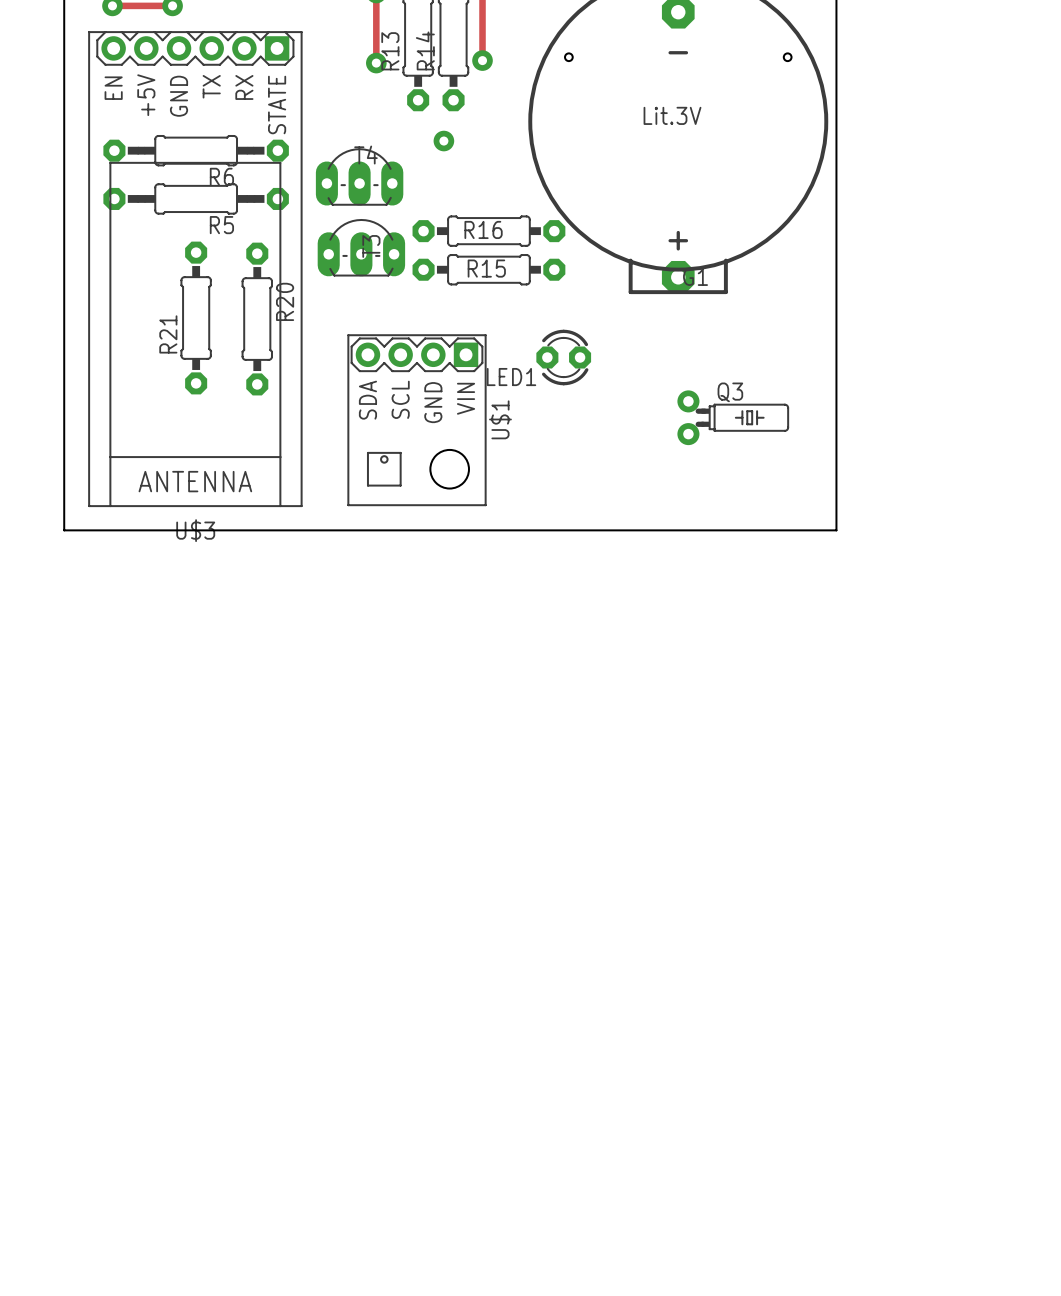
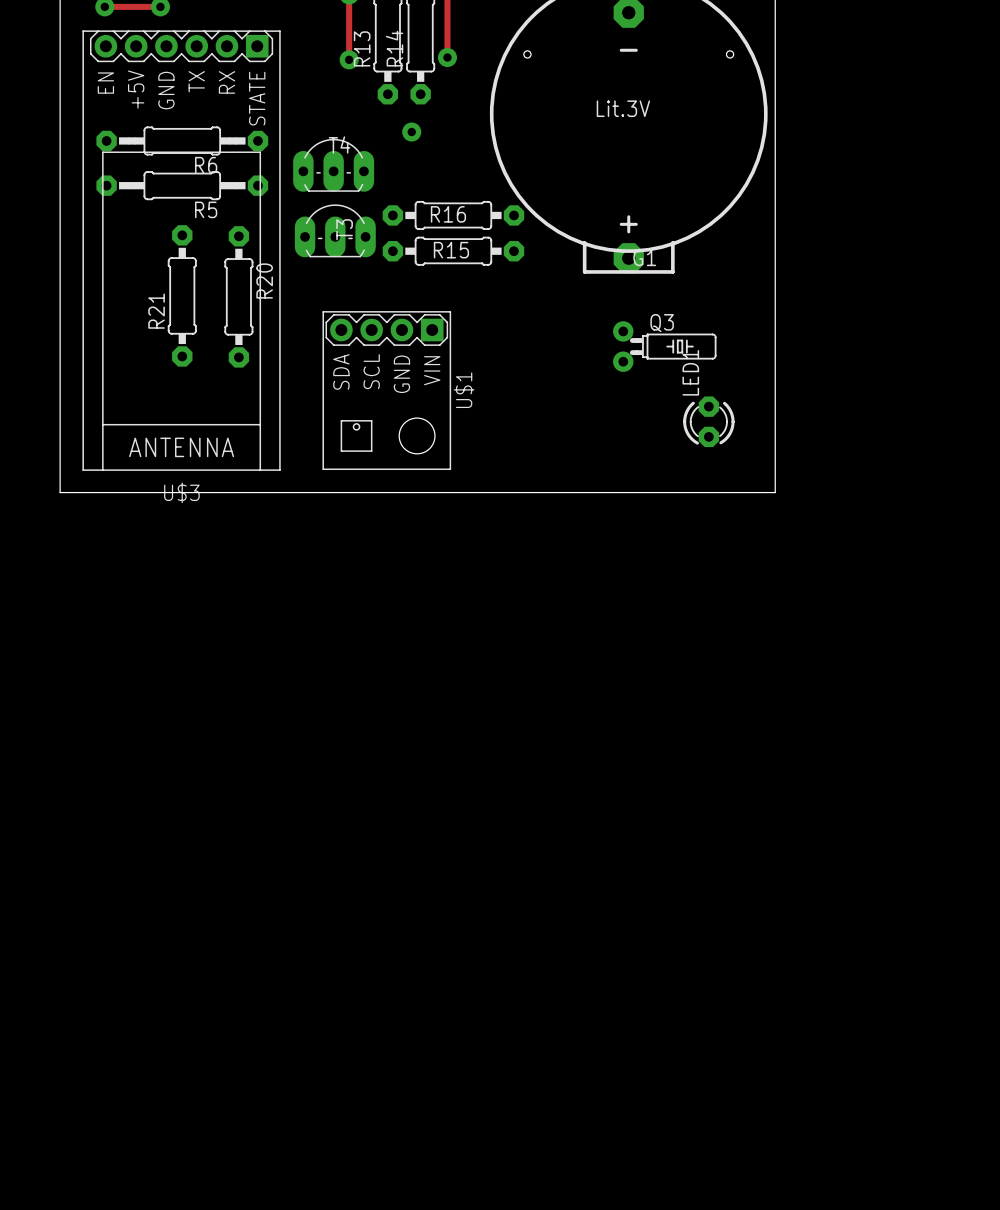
LED1 rotation: 0° (563, 357) -> 90° clockwise (708, 421)
LED1 position: (563, 357) -> (708, 421)
Q3 position: (733, 417) -> (664, 346)

